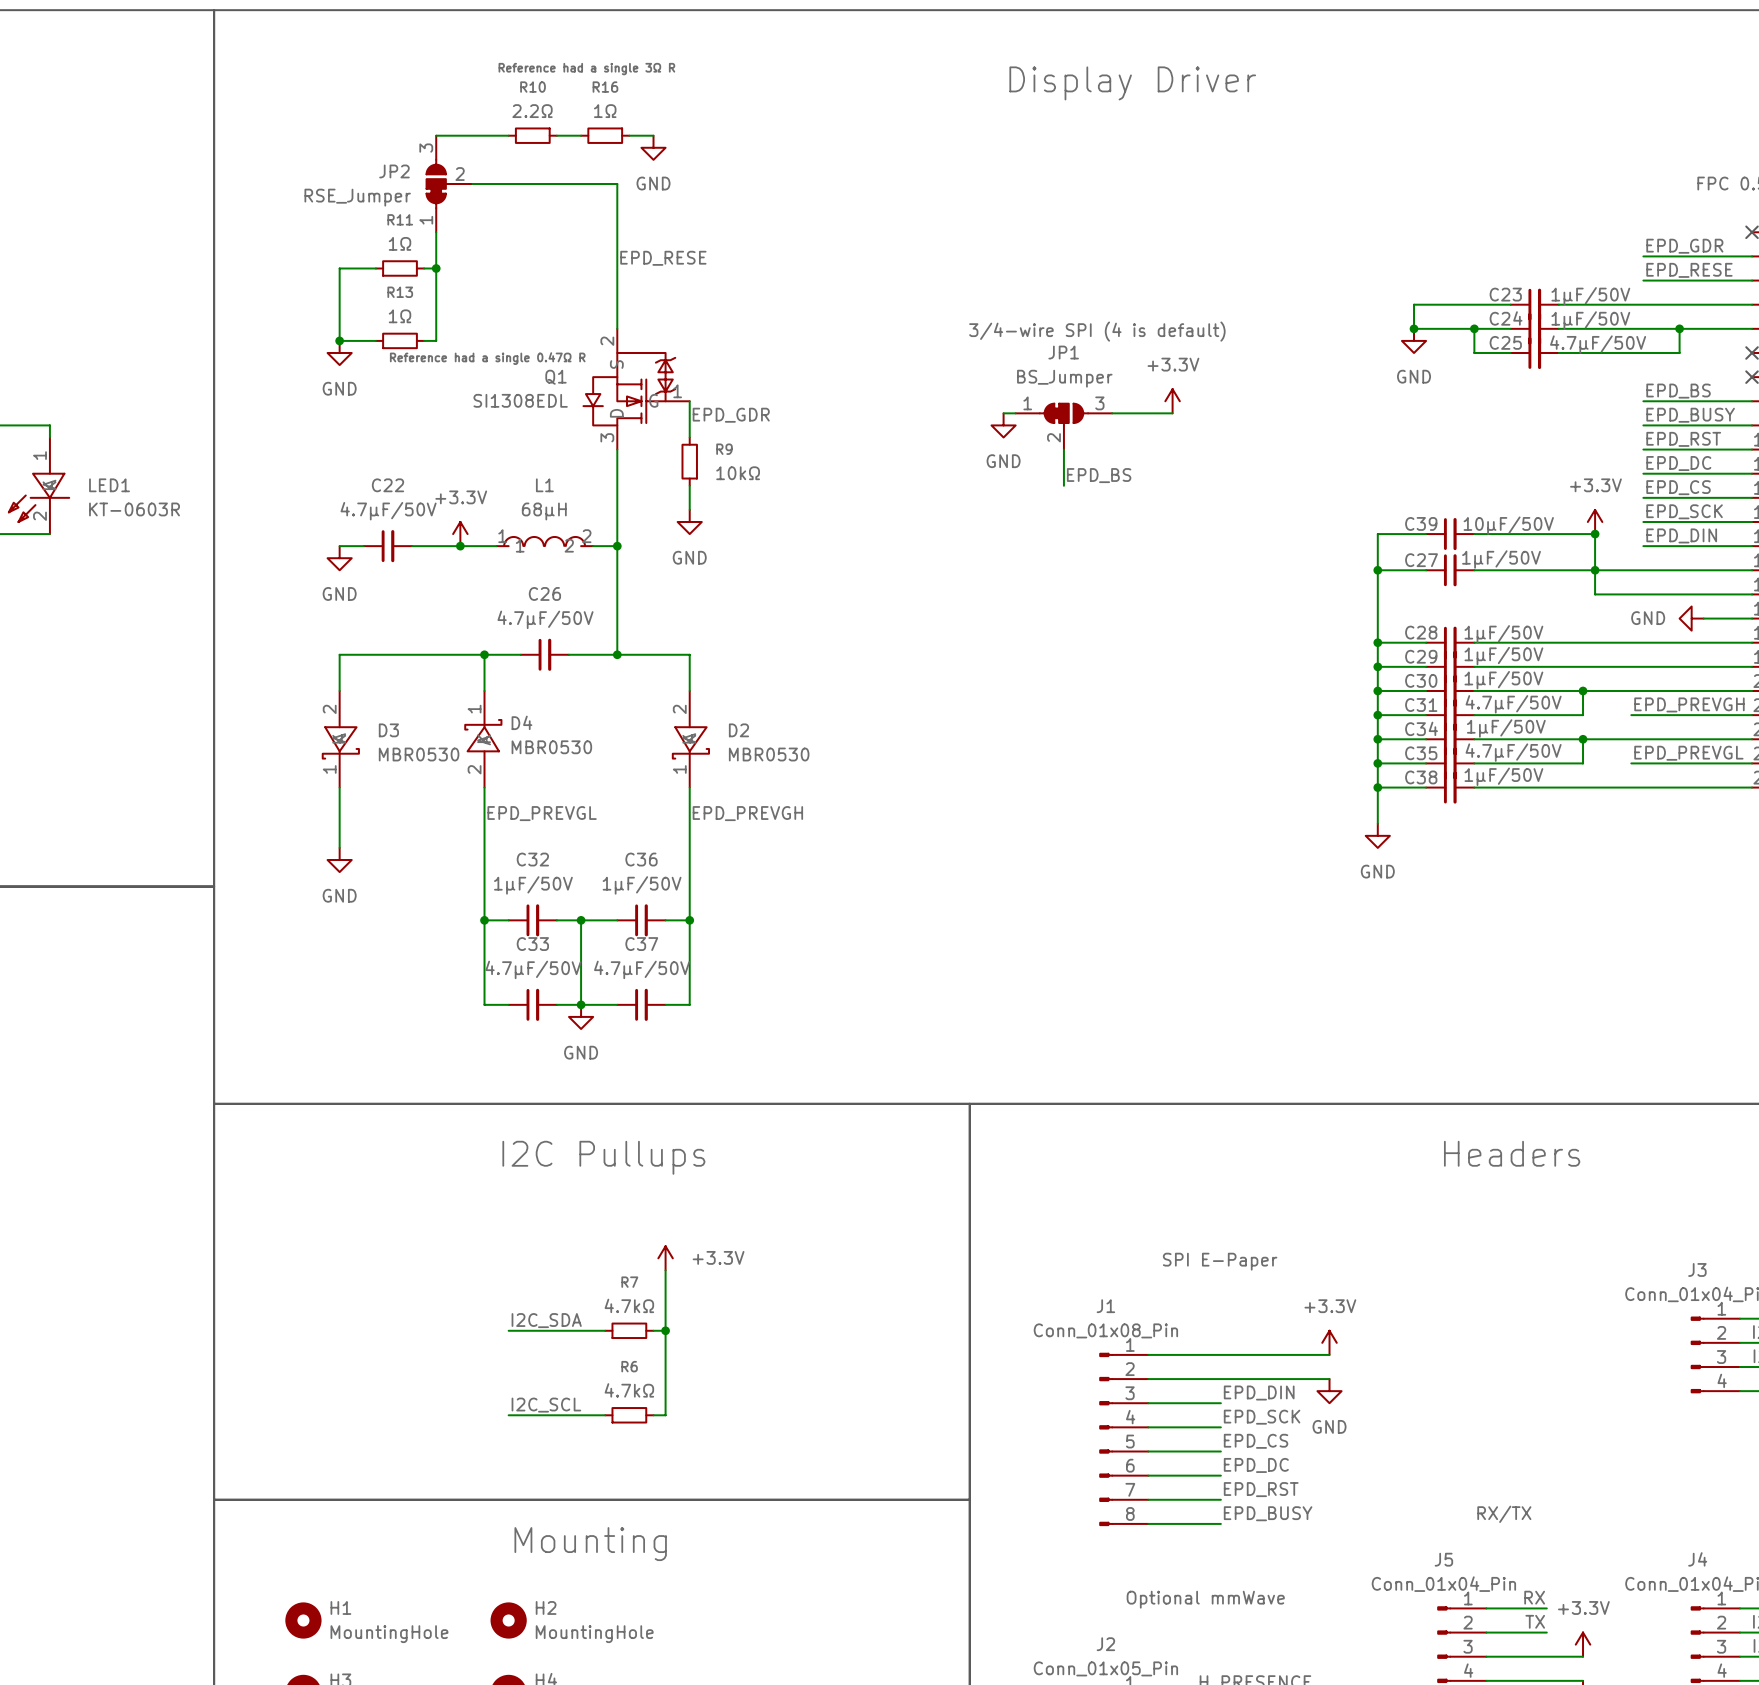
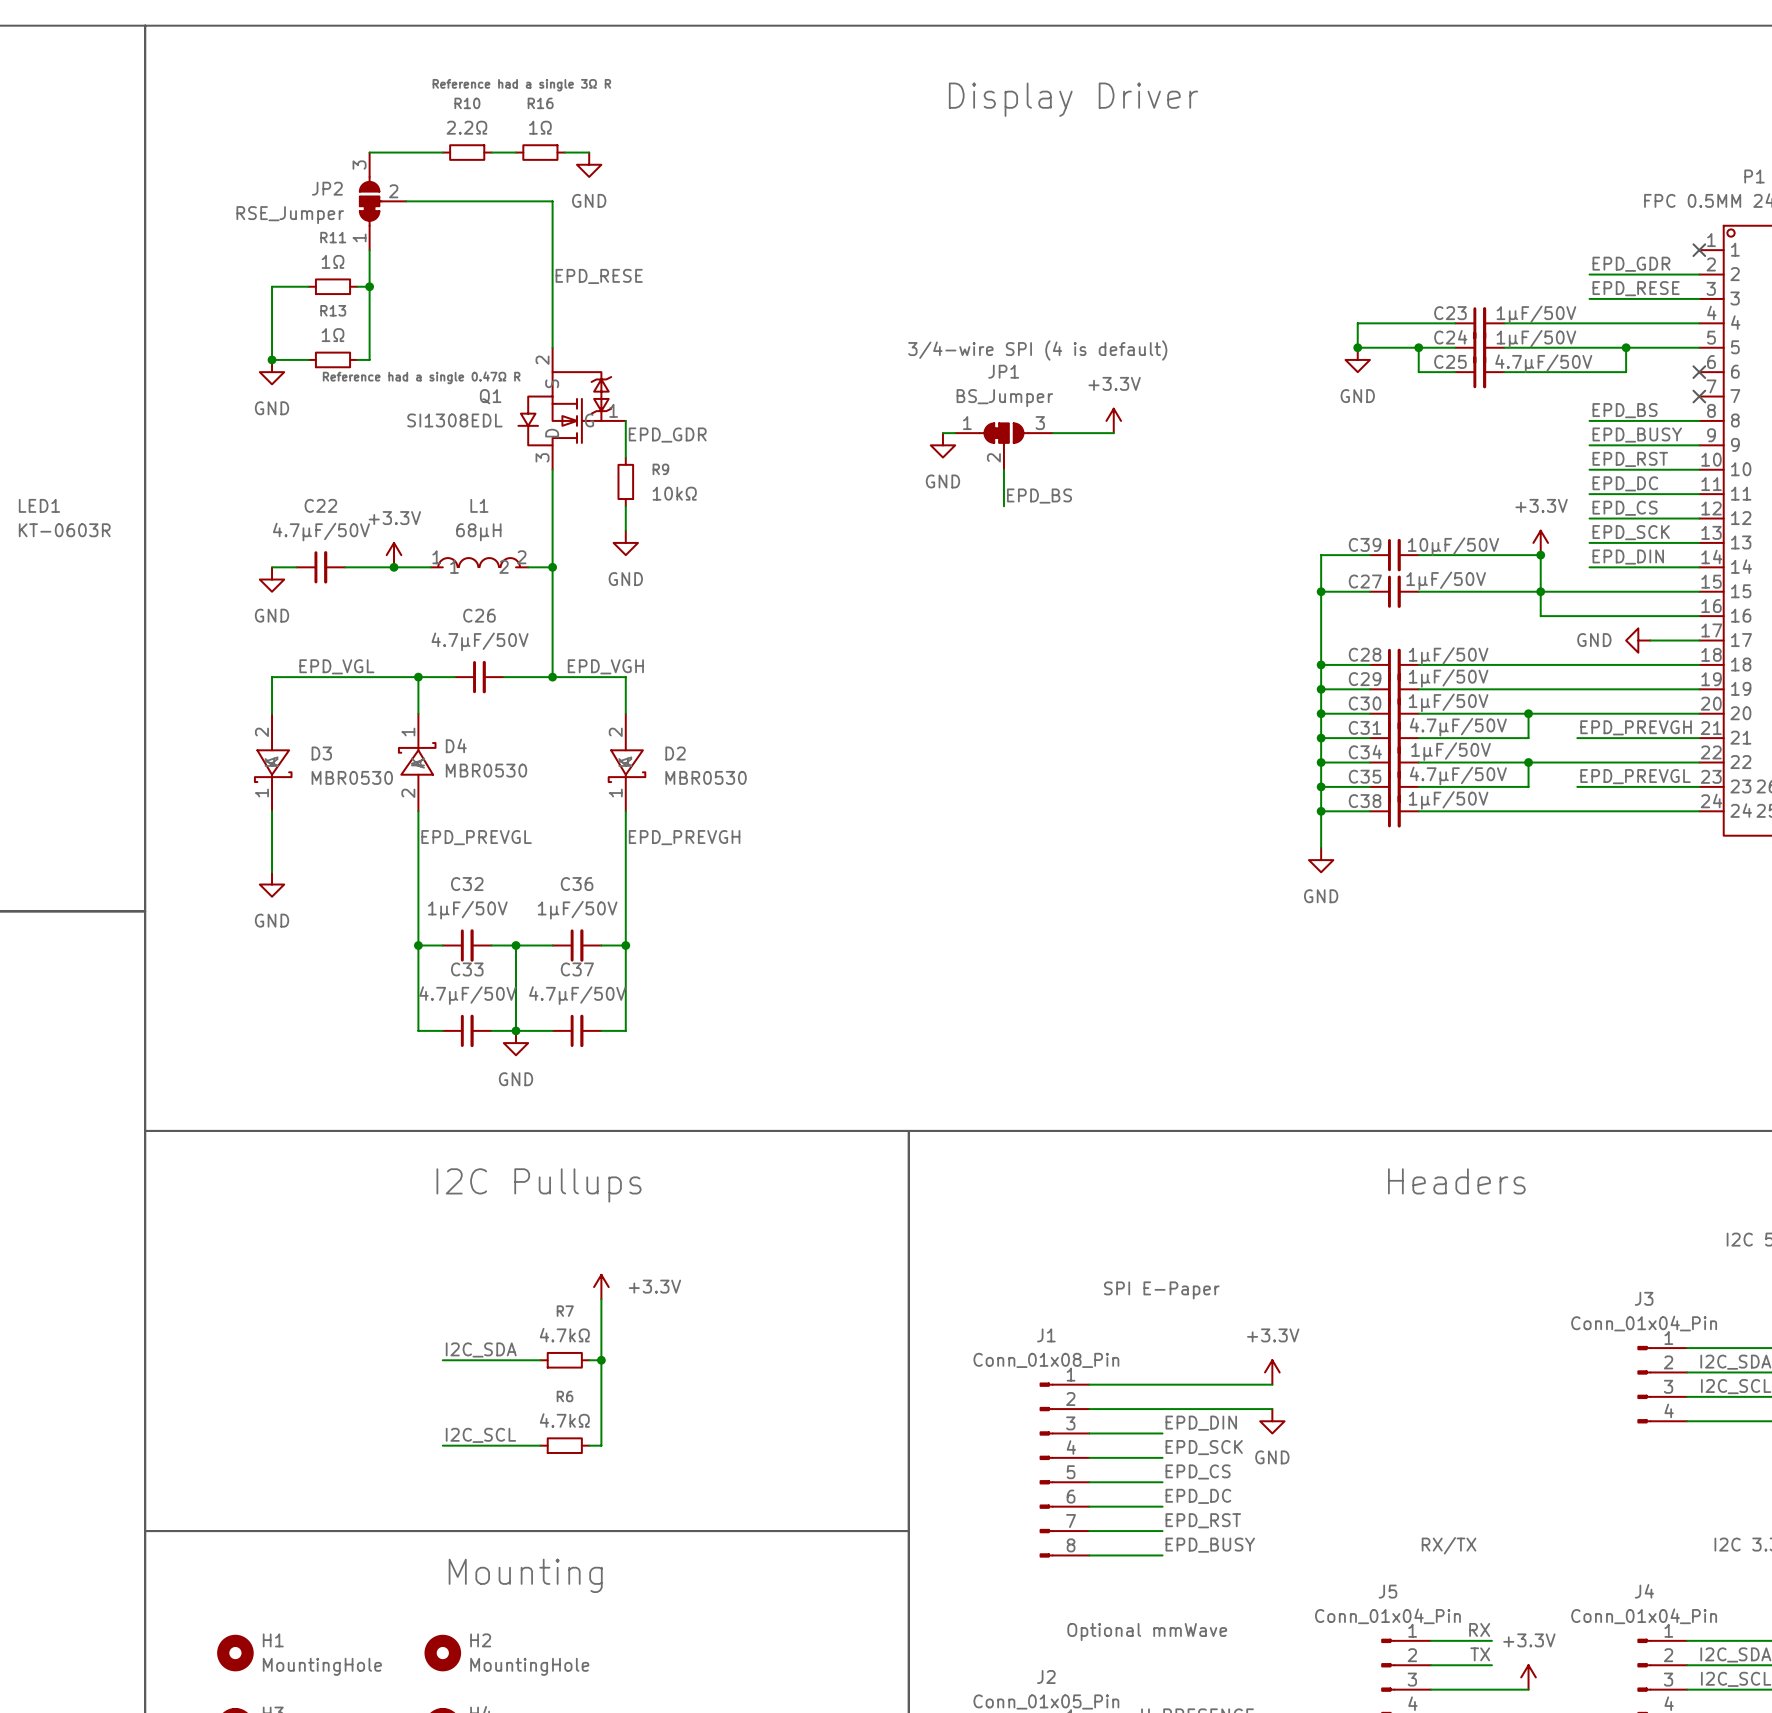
label: none -> EPD_VGL (336, 666)
label: none -> EPD_VGH (605, 666)

